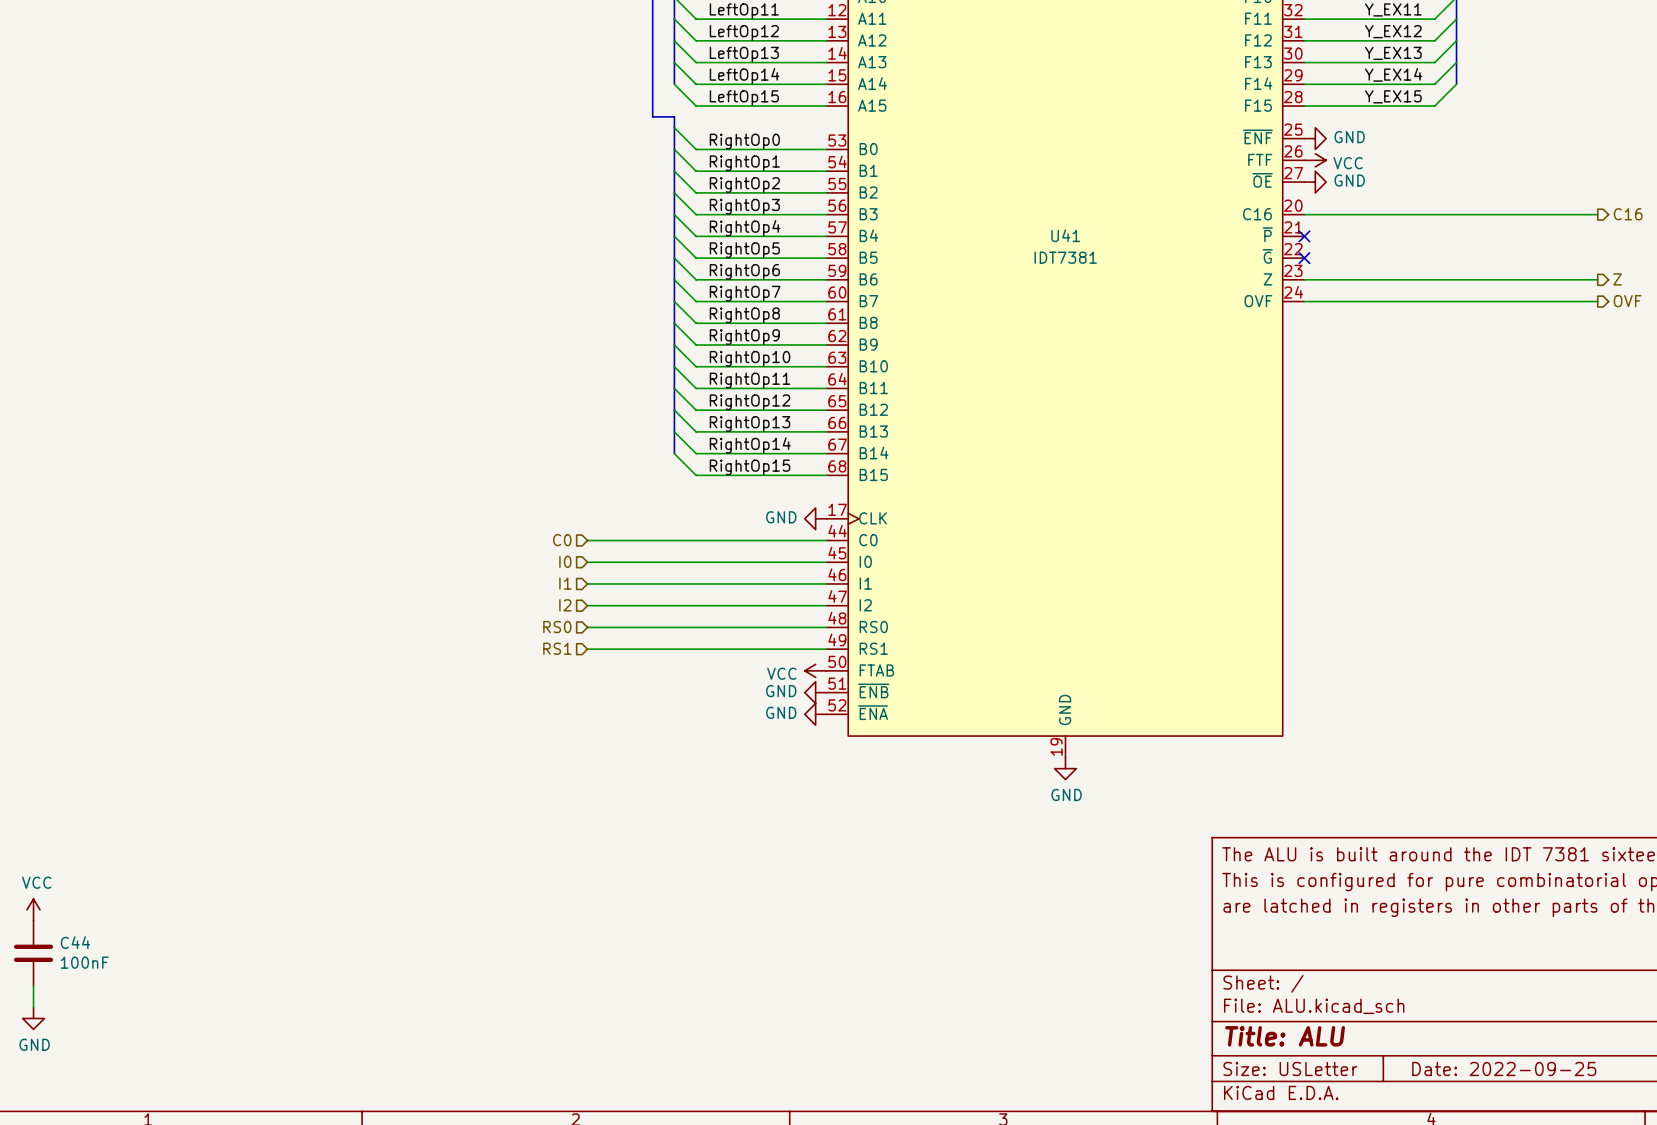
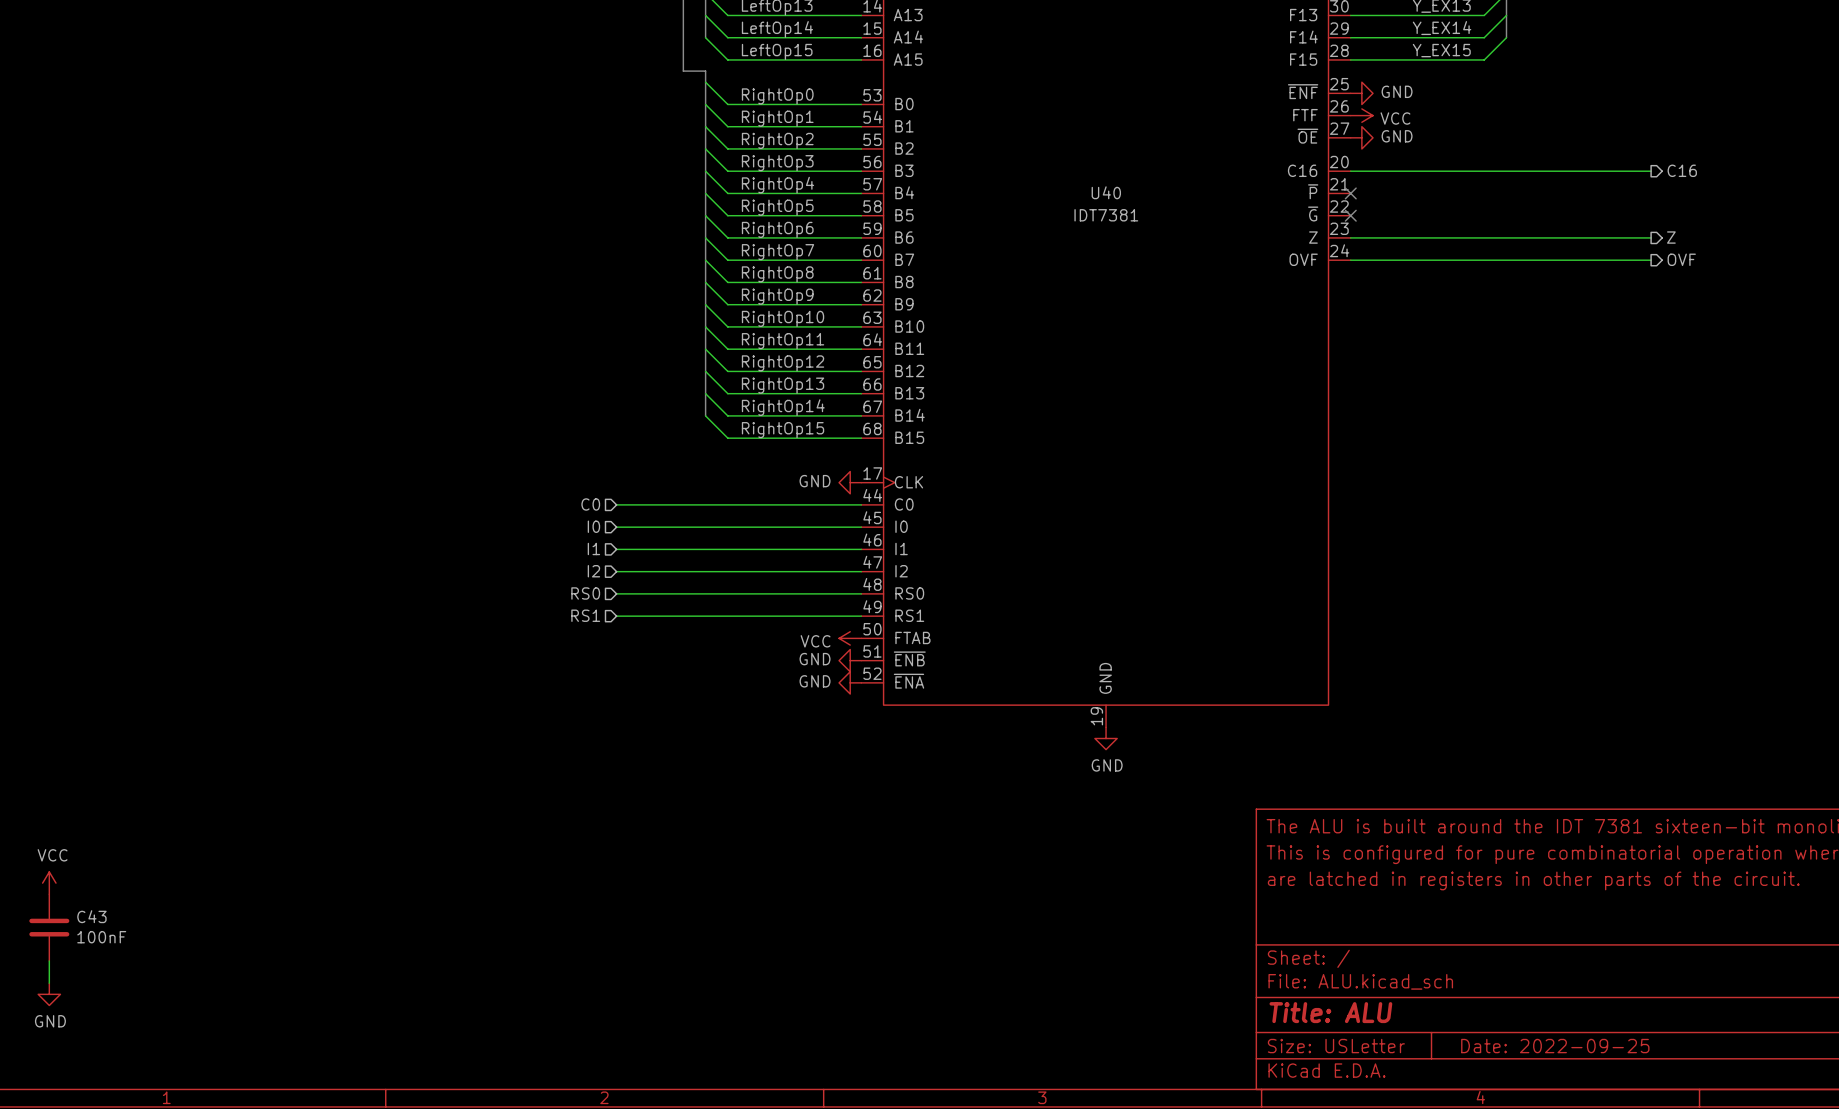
U41 name: U41 (1065, 235) -> U40 (1106, 192)
C44 name: C44 (75, 942) -> C43 (91, 916)

